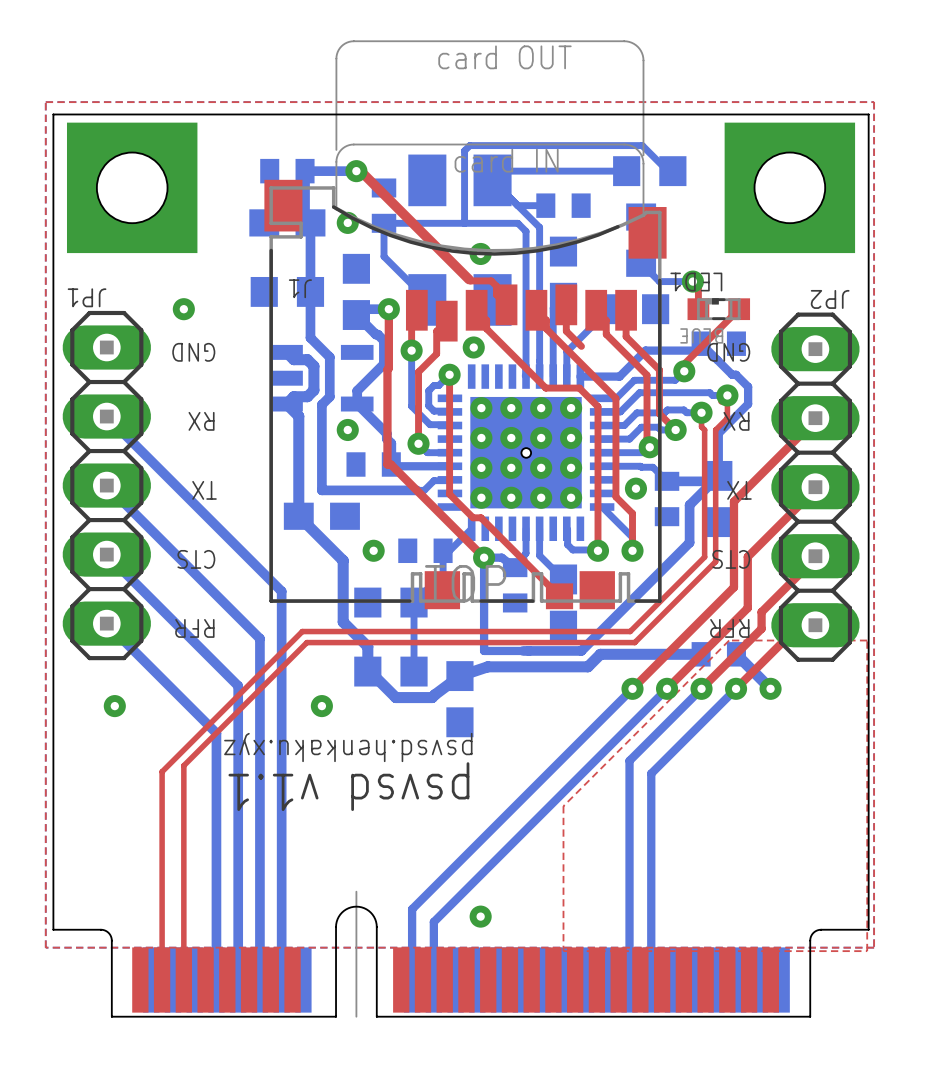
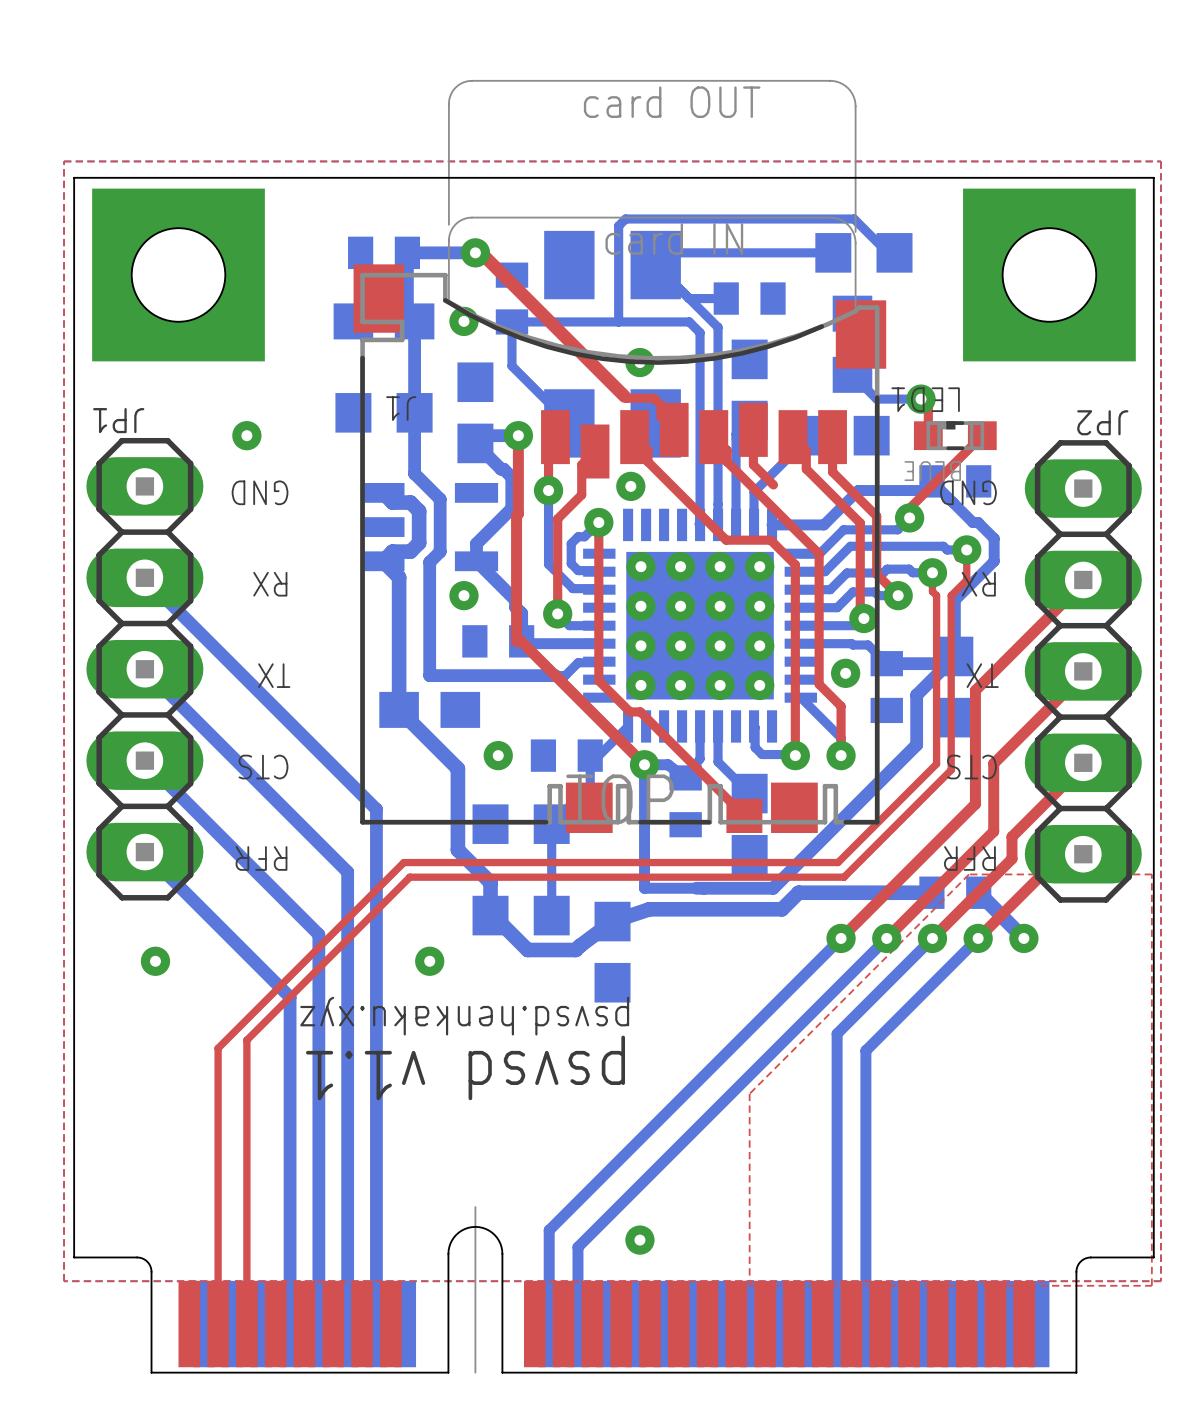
hole: (526, 452) -> none

